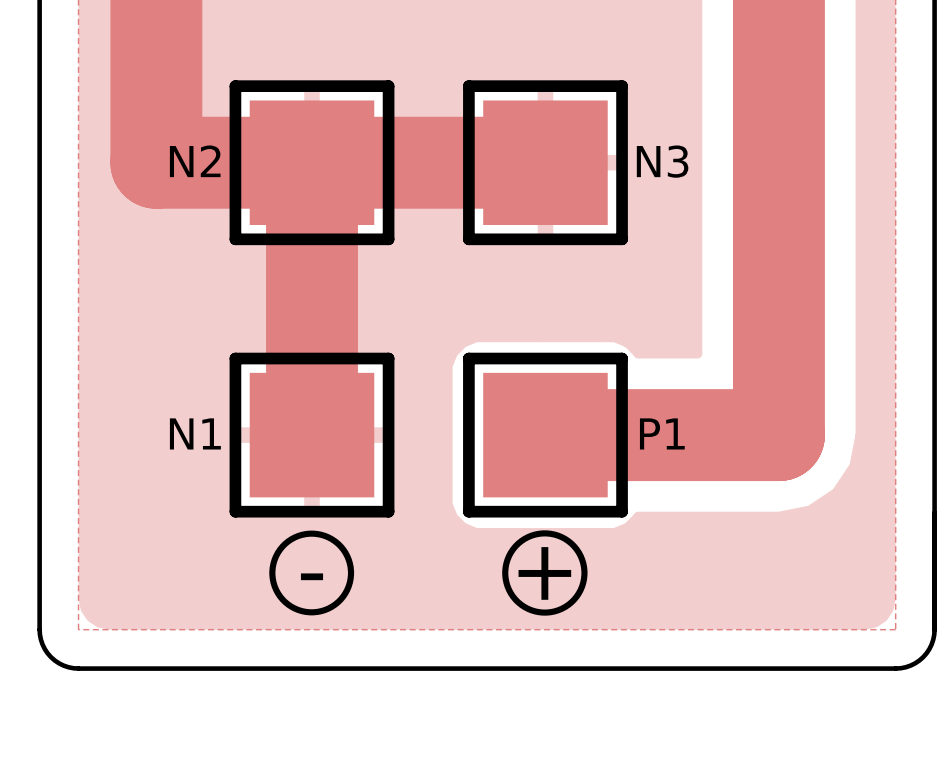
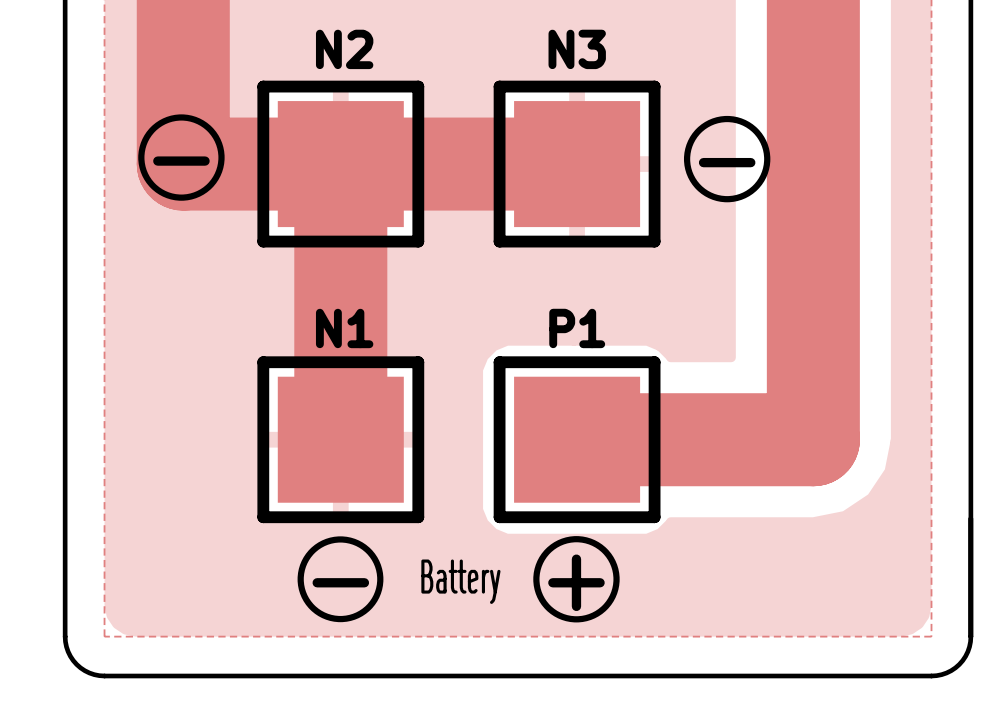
drawing: none -> [138, 114, 225, 201]
drawing: none -> [683, 115, 771, 203]
text: none -> - (181, 161)
N2 name position: N2 (195, 161) -> N2 (344, 49)
N3 name position: N3 (662, 161) -> N3 (577, 49)
text: none -> - (727, 162)
N1 name position: N1 (195, 433) -> N1 (344, 328)
P1 name position: P1 (662, 433) -> P1 (577, 328)
text: none -> Battery (460, 581)

